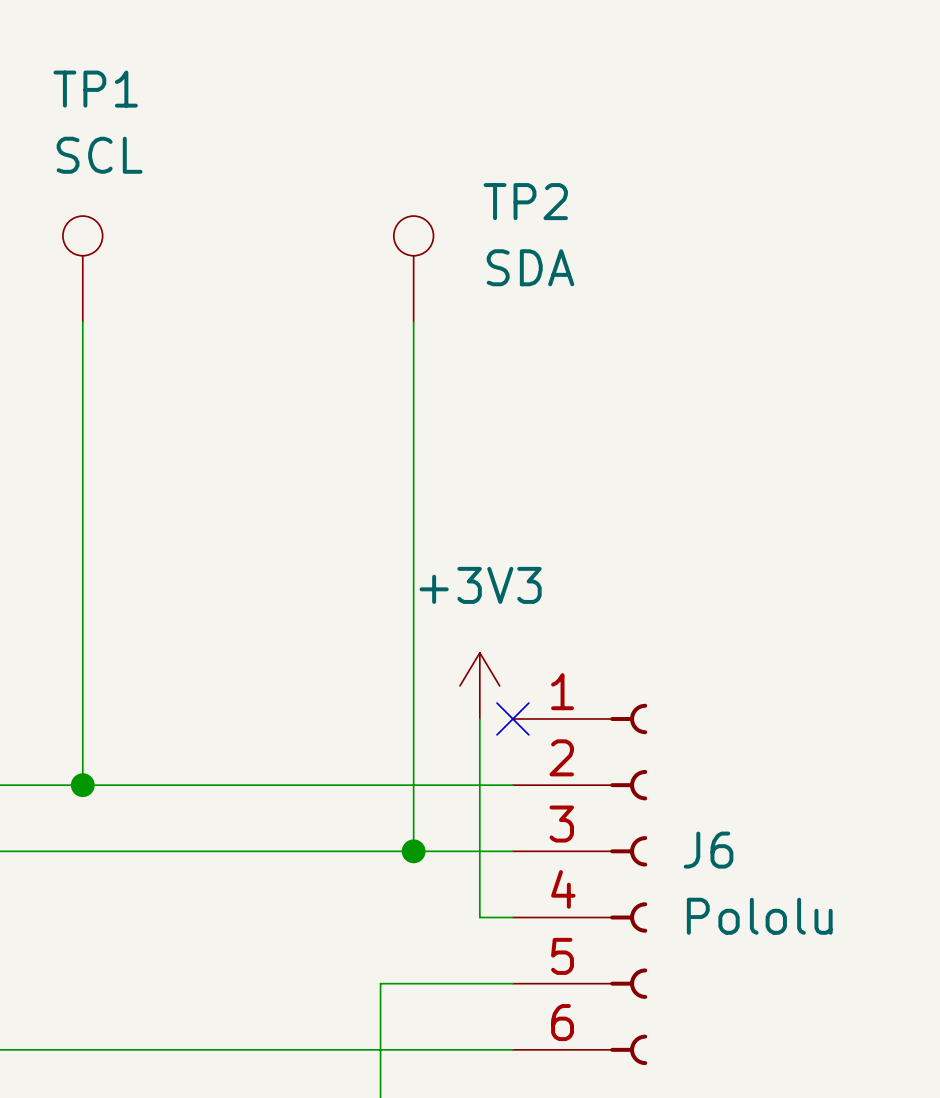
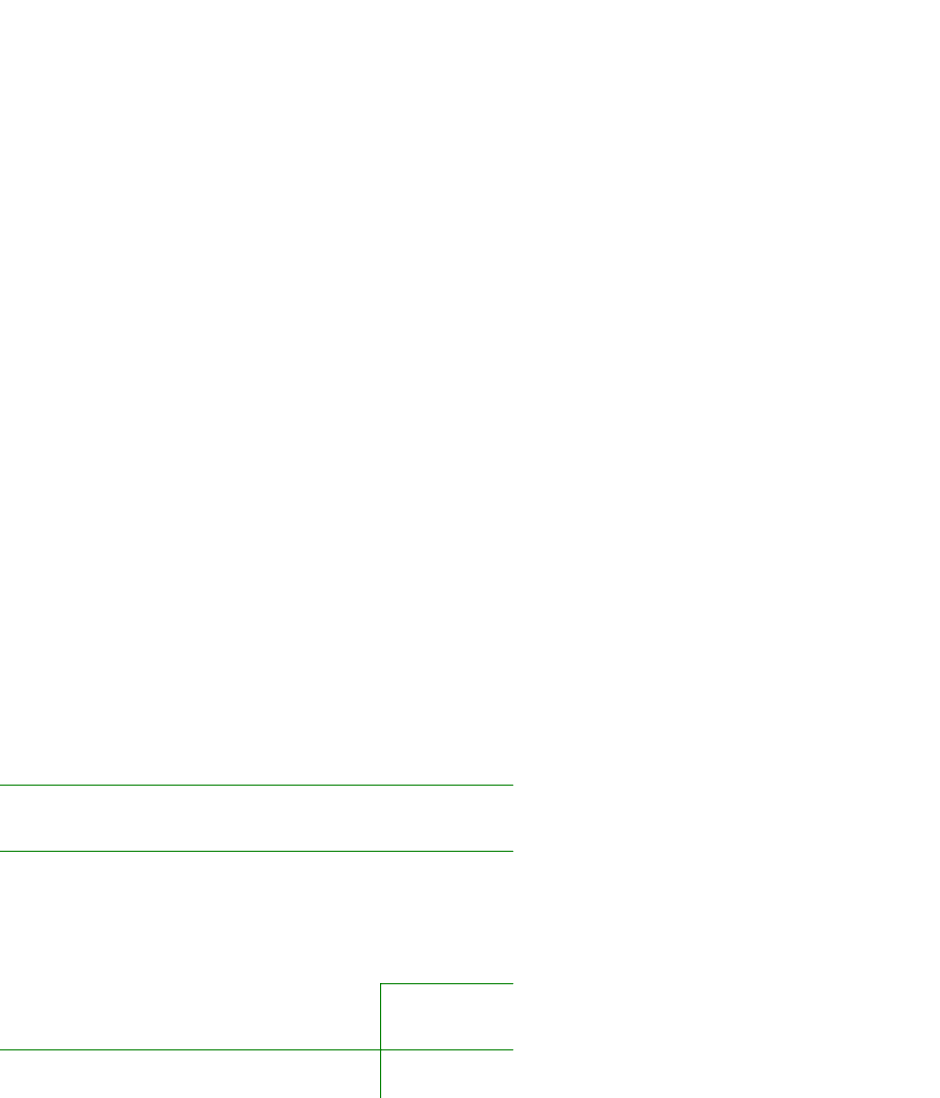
TP1: SCL (82, 269) -> none
TP2: SDA (413, 269) -> none
wire: (82, 321) (82, 785) -> none
wire: (413, 321) (413, 851) -> none
power symbol: +3V3 (479, 685) -> none
wire: (479, 718) (479, 917) (512, 917) -> none
no-connect mark: (512, 718) -> none
junction: (82, 785) -> none
junction: (413, 851) -> none
J6: Pololu (580, 884) -> none

